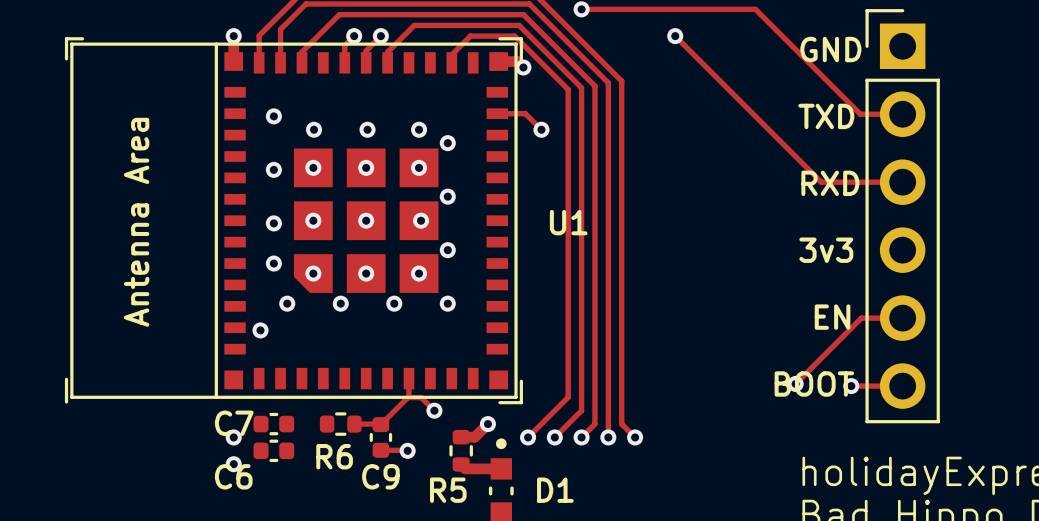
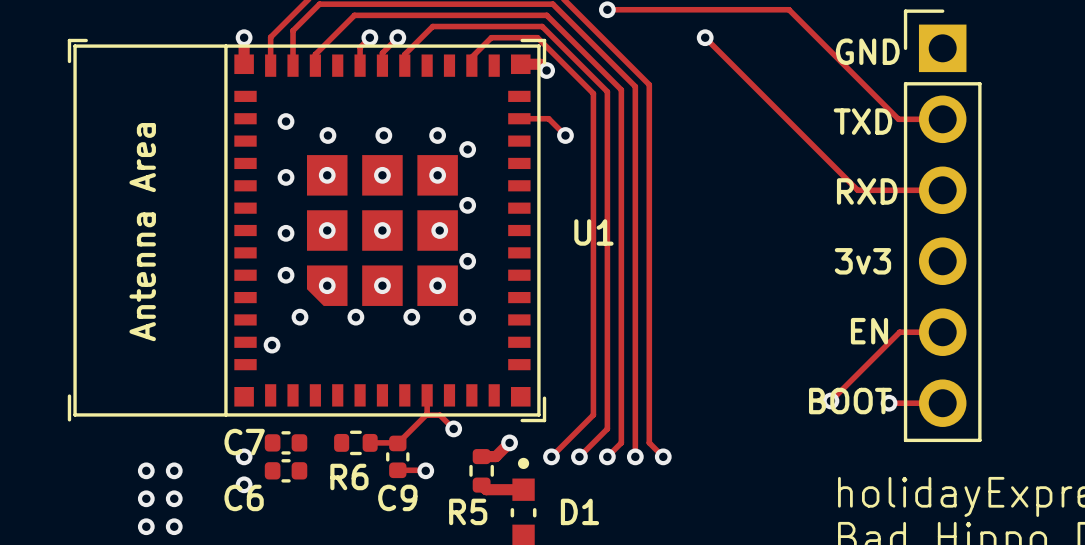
via: none -> (146, 470)
via: none -> (174, 470)
via: none -> (146, 498)
via: none -> (174, 498)
via: none -> (146, 526)
via: none -> (174, 526)

